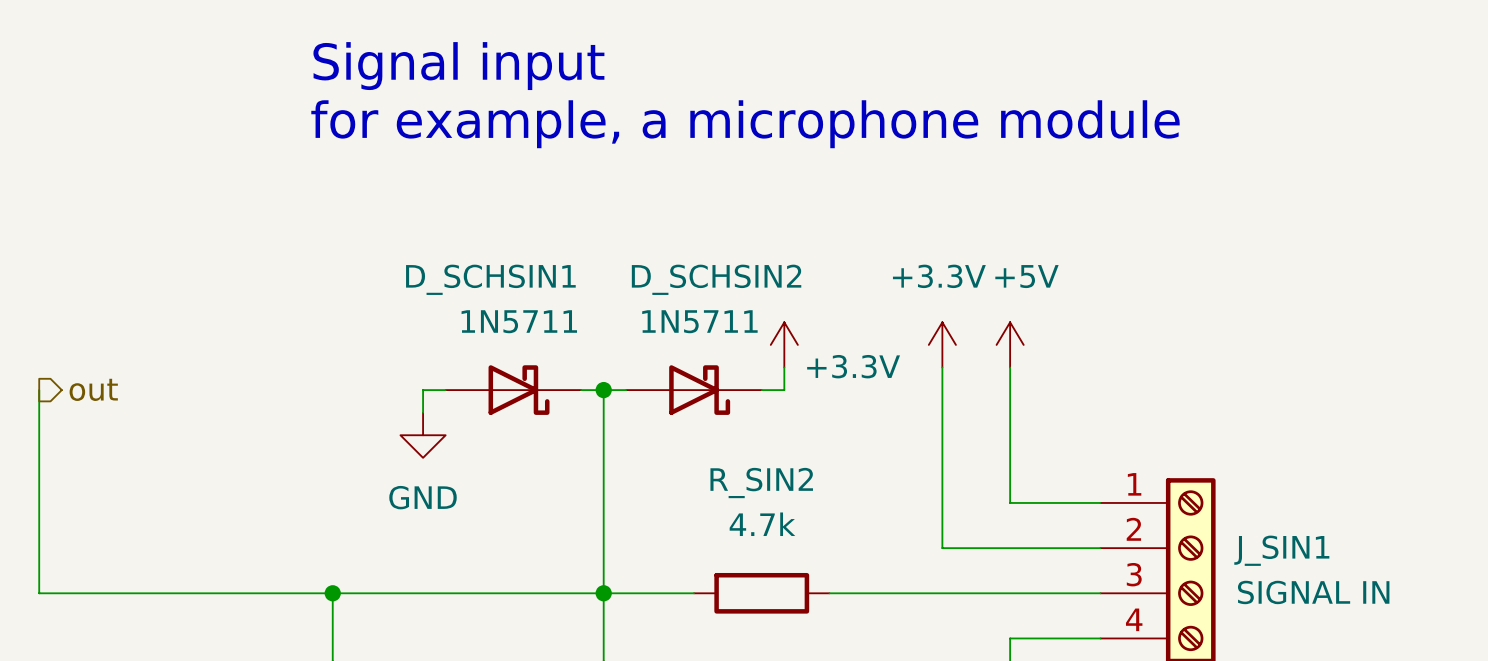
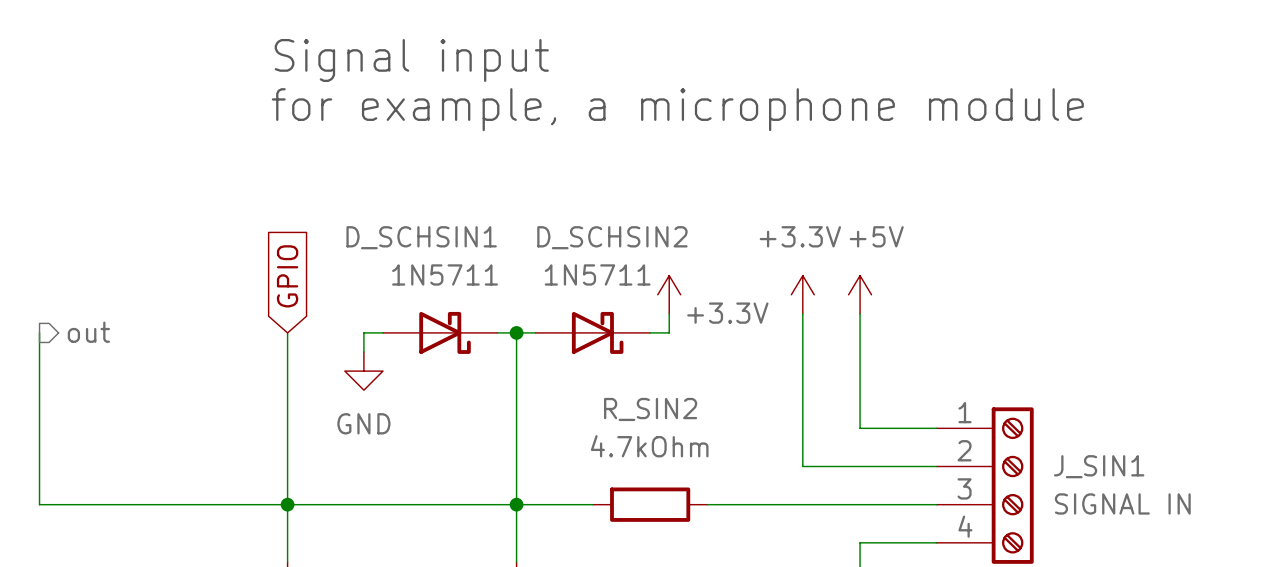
global label: none -> GPIO (287, 276)
wire: none -> (287, 332) (287, 504)
R_SIN2 value: 4.7k (762, 524) -> 4.7kOhm (649, 446)

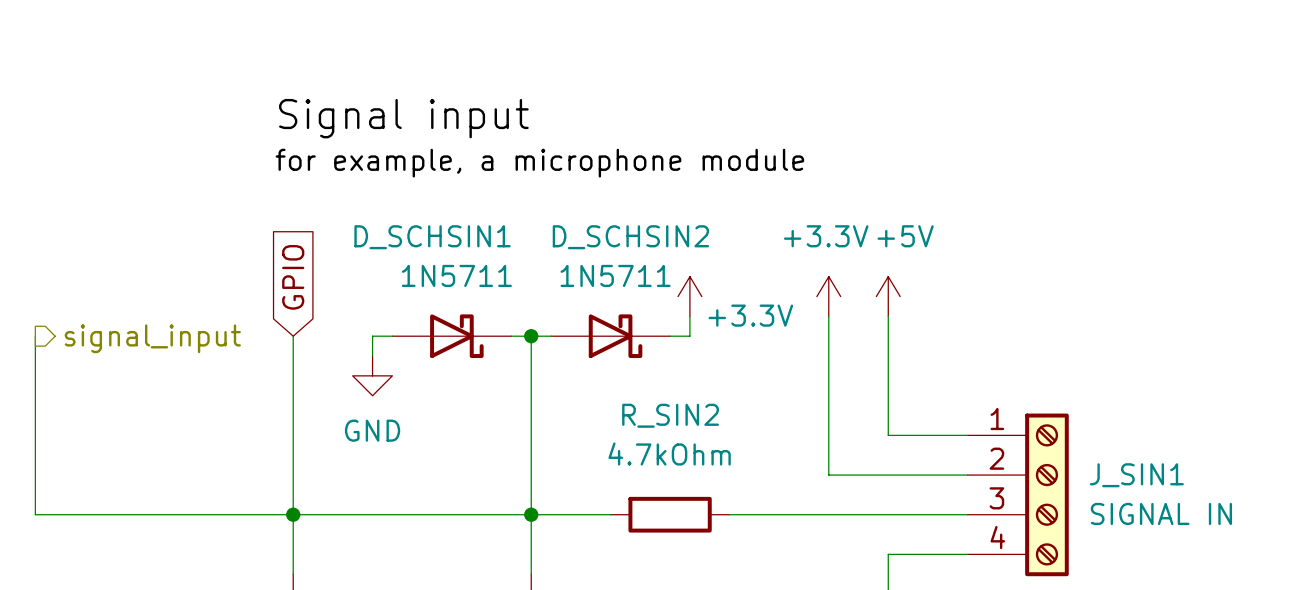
text: Signal input (411, 60) -> none
text: for example, a microphone module (677, 109) -> none
label: none -> Signal input (403, 118)
label: none -> for example, a microphone module (539, 163)
hierarchical label: out (88, 332) -> signal_input (152, 338)

